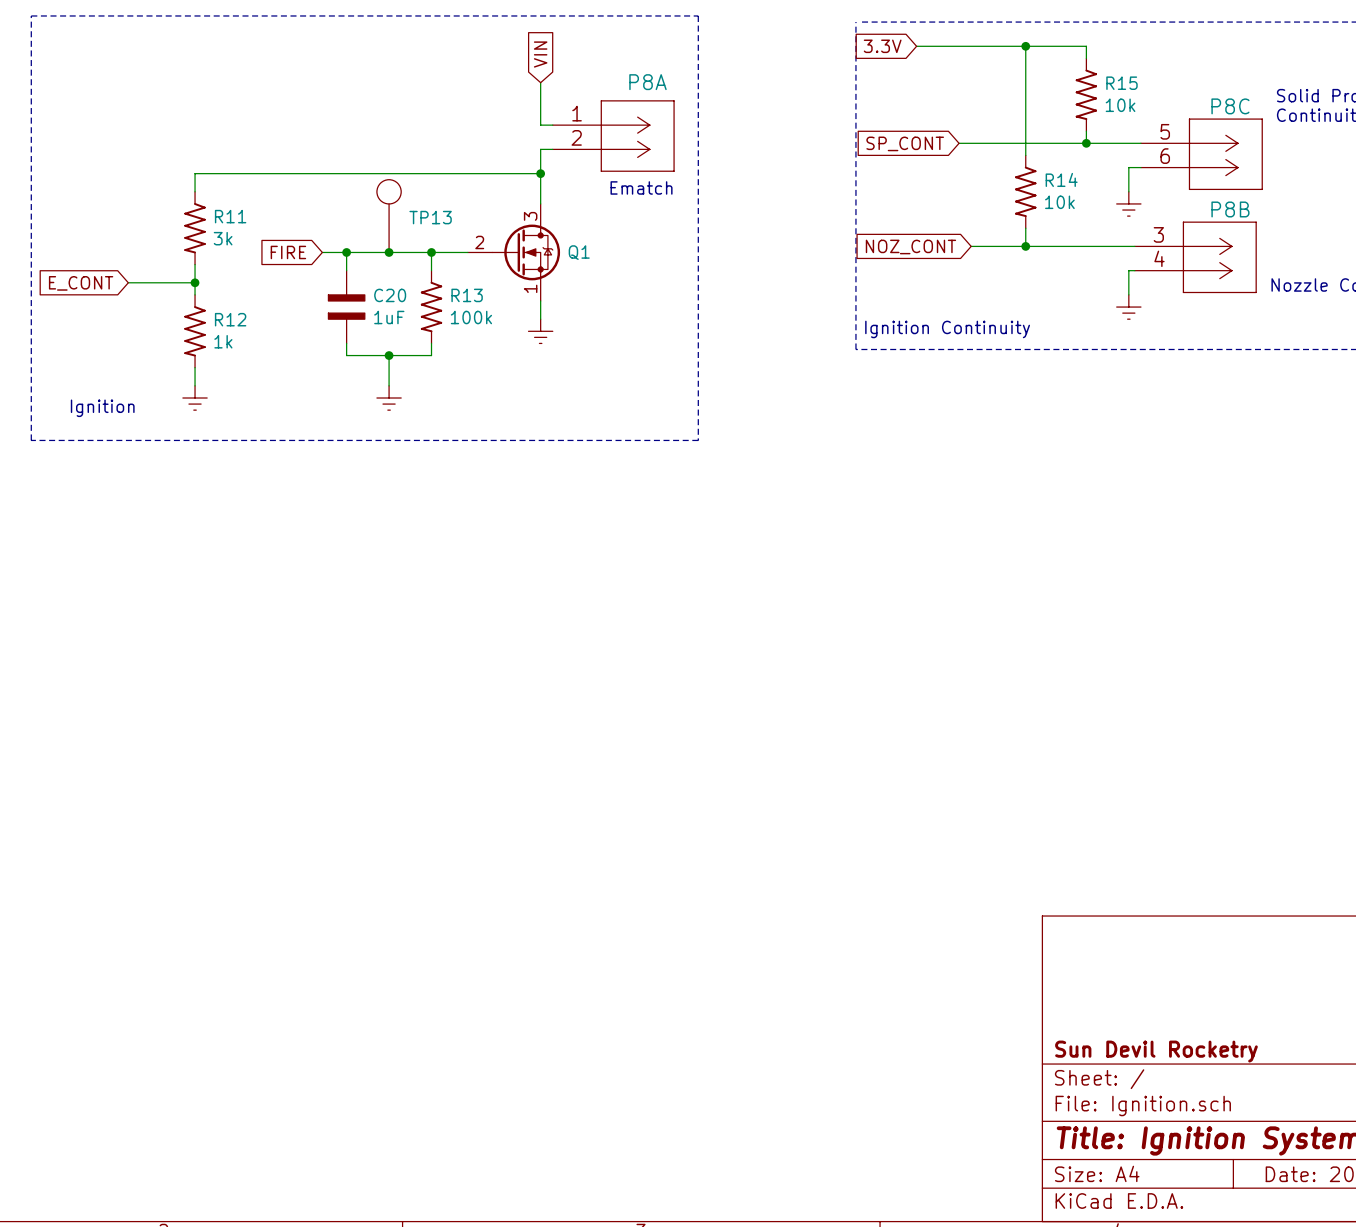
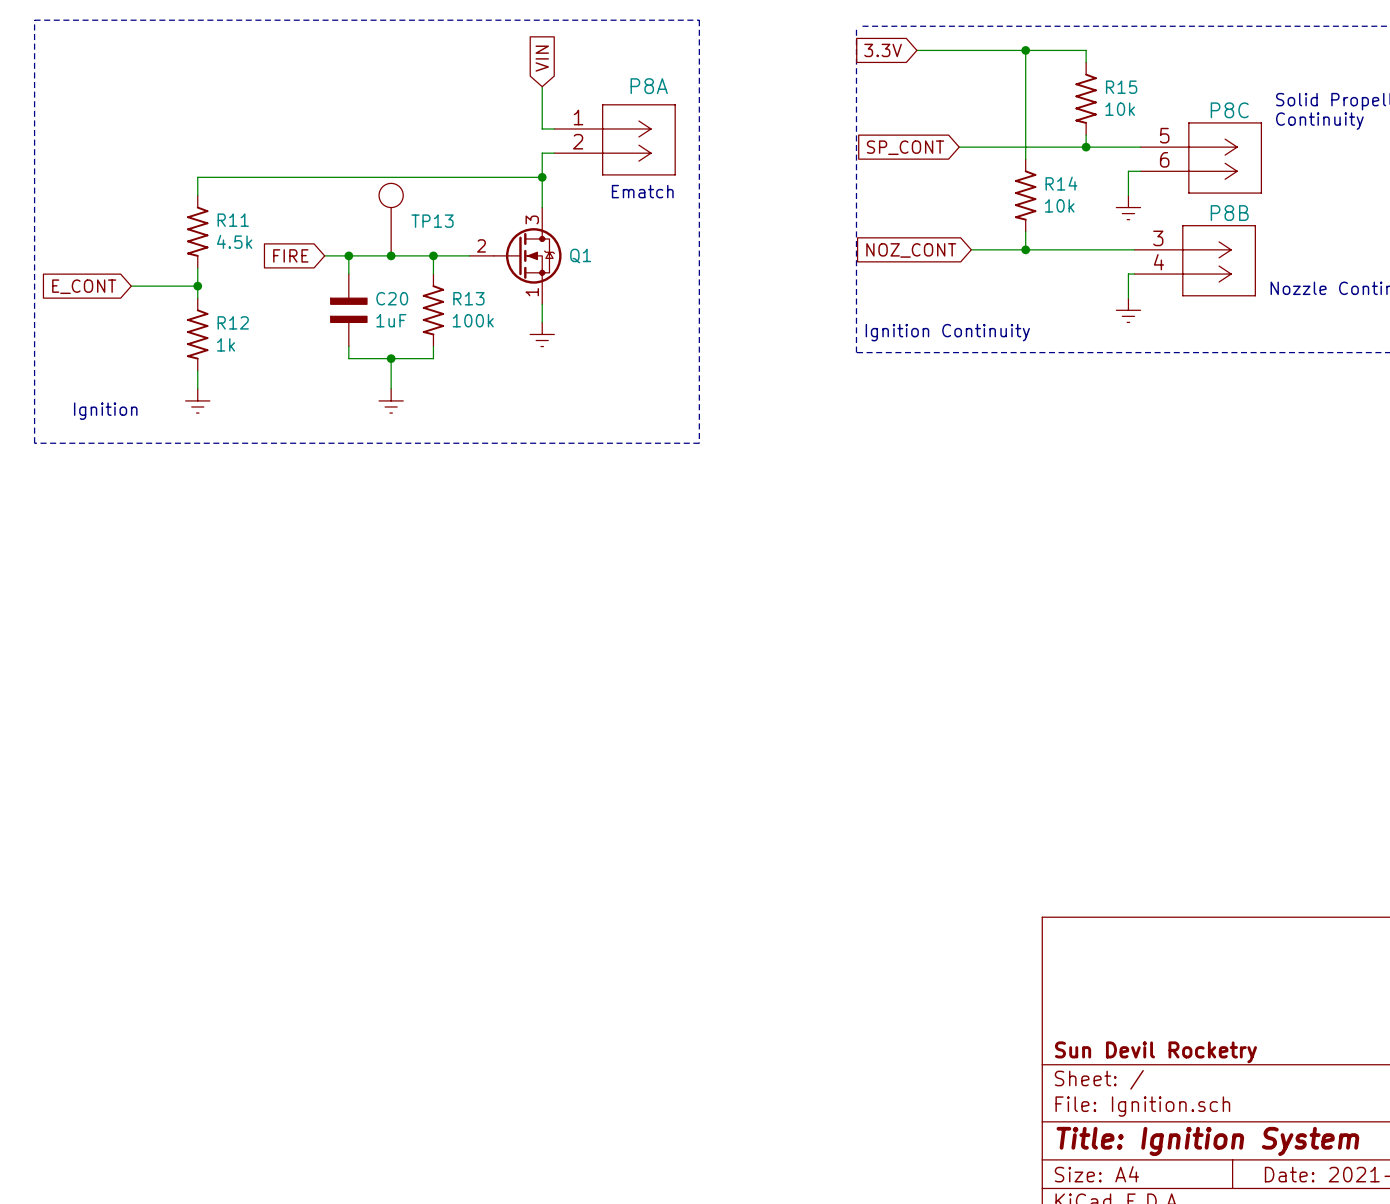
R11 value: 3k (223, 238) -> 4.5k (234, 241)

